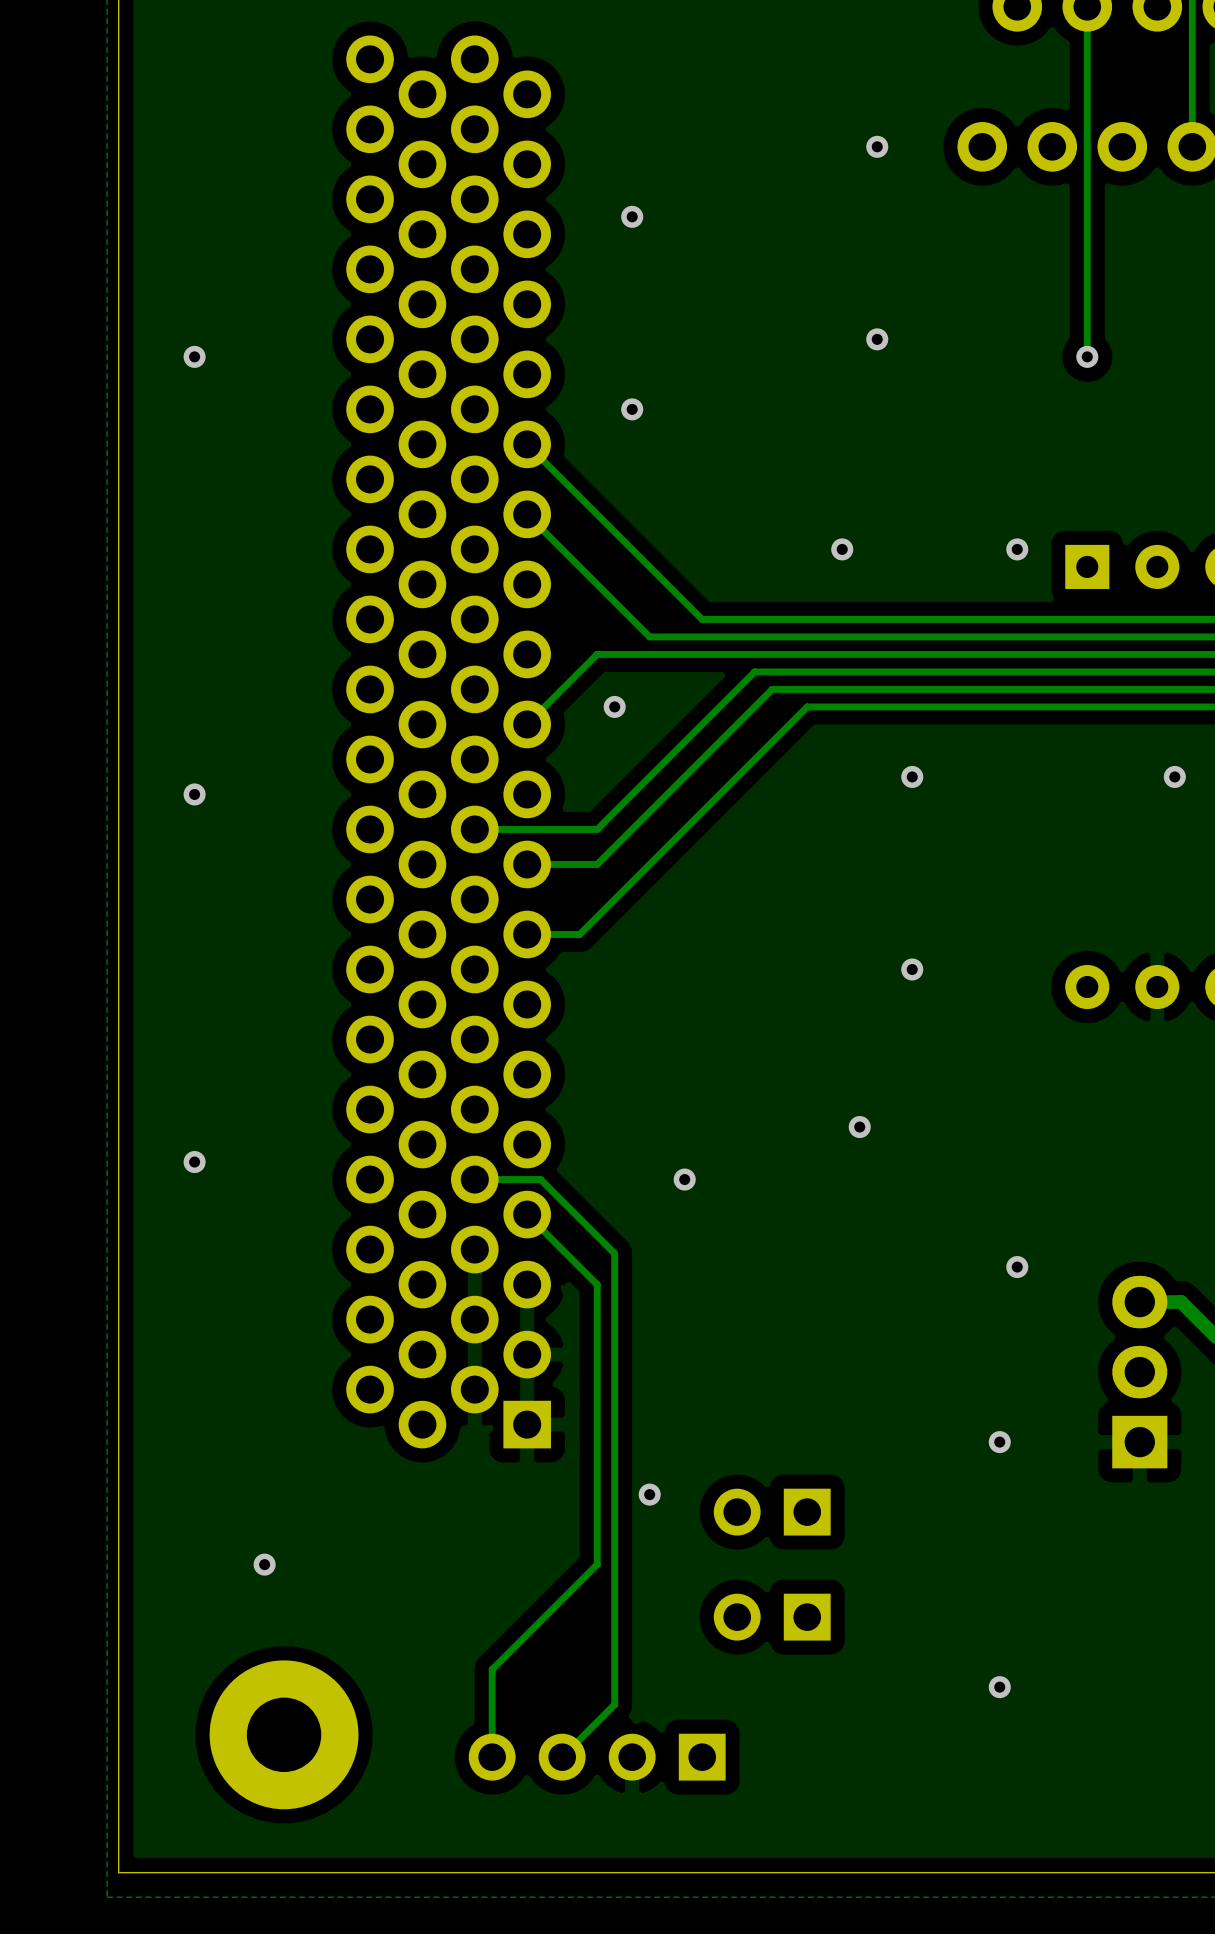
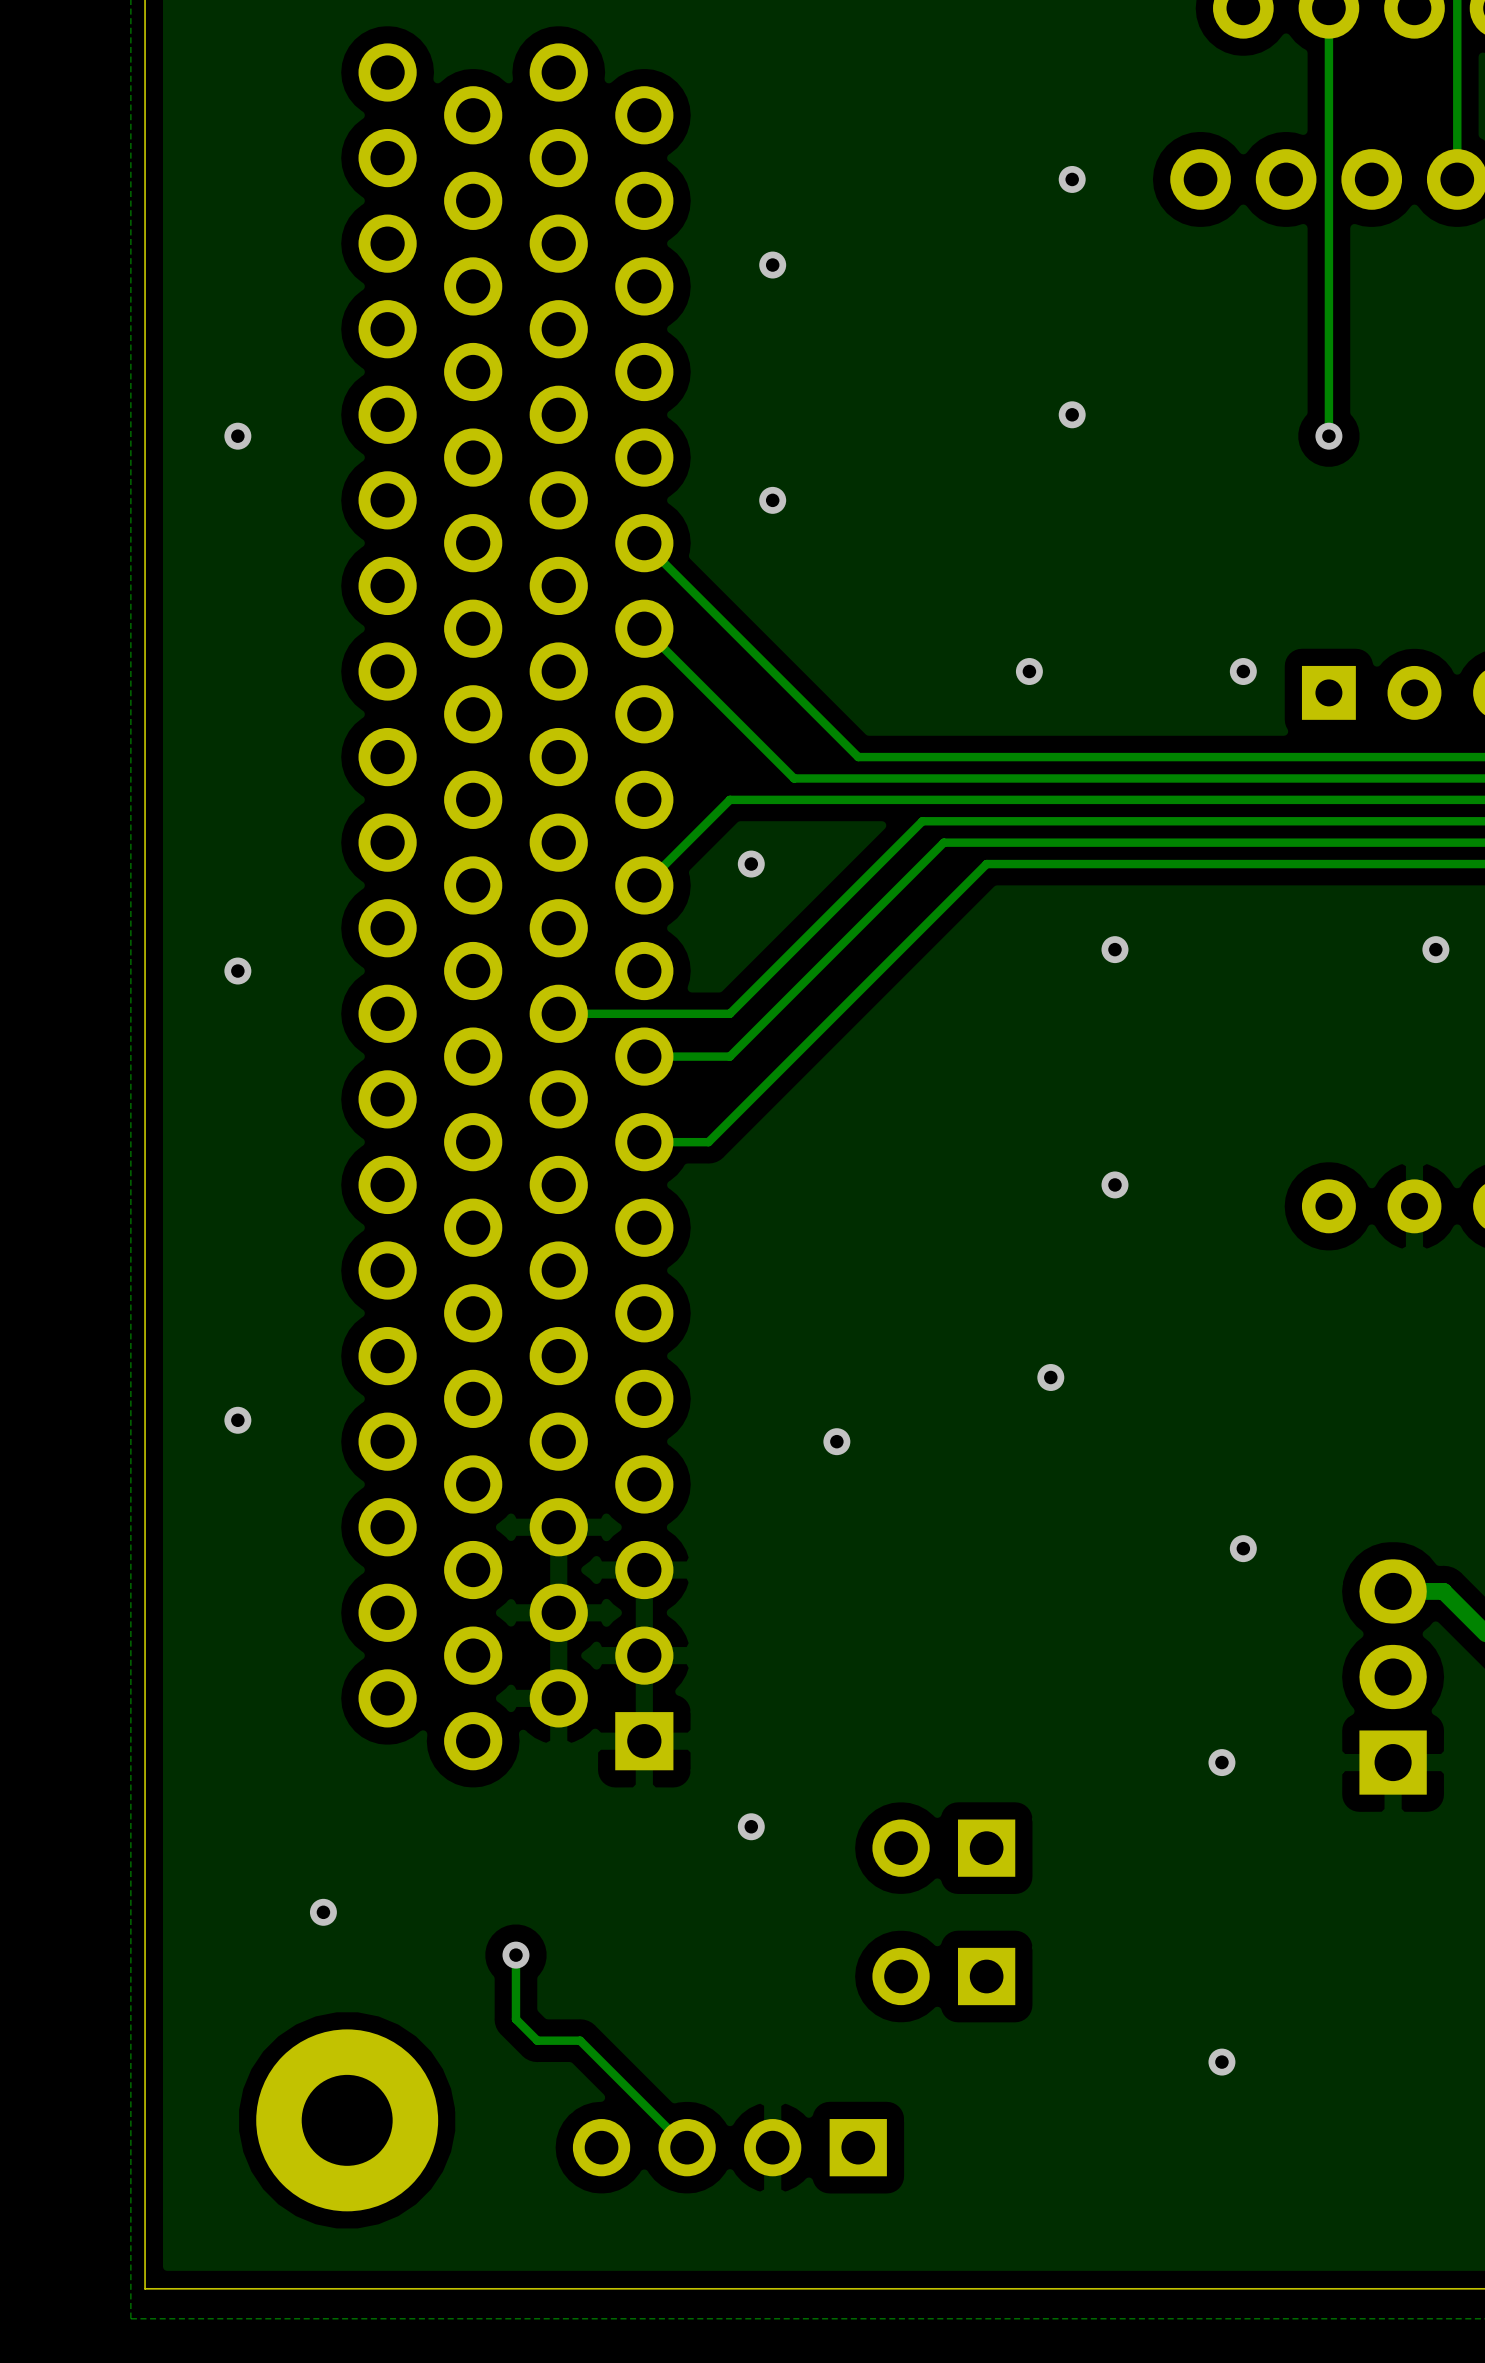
part footprint: [346, 35, 551, 1449] -> [358, 43, 674, 1771]
track: (474, 1179) (540, 1179) (614, 1253) (614, 1704) (562, 1757) -> (515, 1955) (515, 2019) (537, 2040) (580, 2040) (687, 2147)
track: (527, 1214) (597, 1284) (597, 1564) (492, 1669) (492, 1757) -> none
via position: (649, 1494) -> (751, 1826)
via: none -> (515, 1955)

